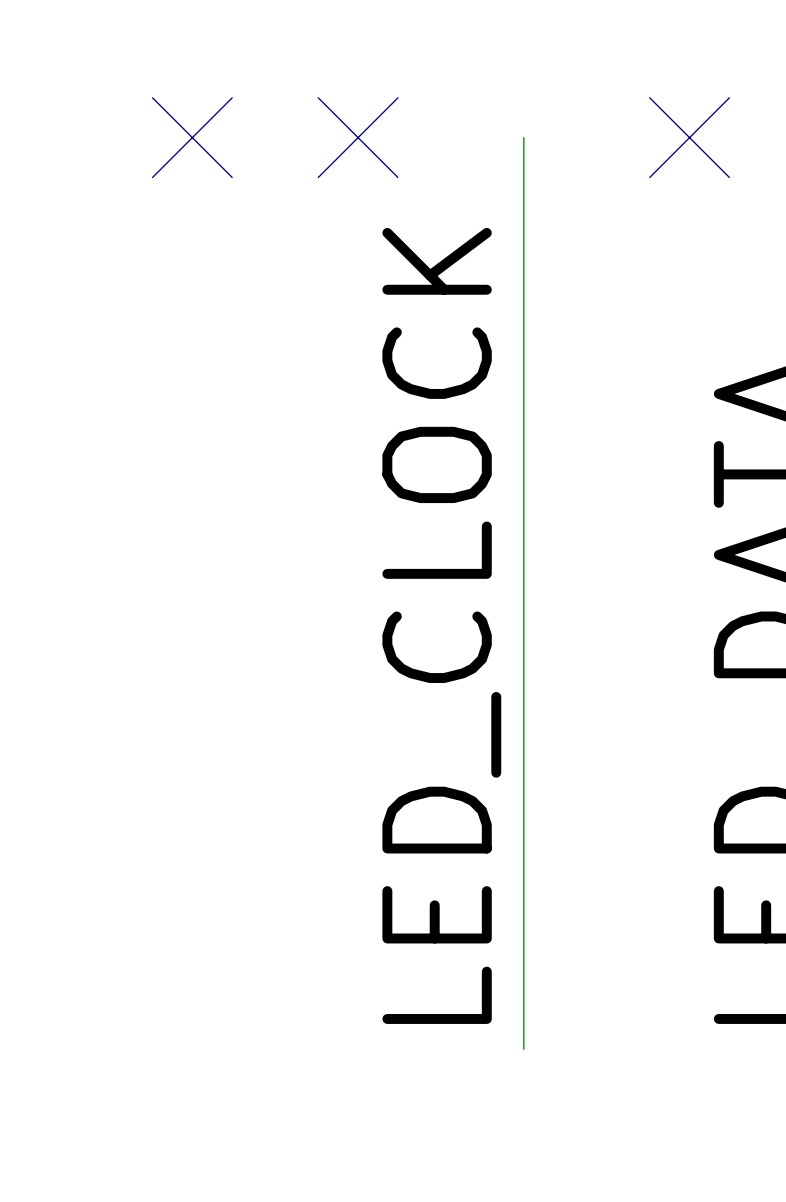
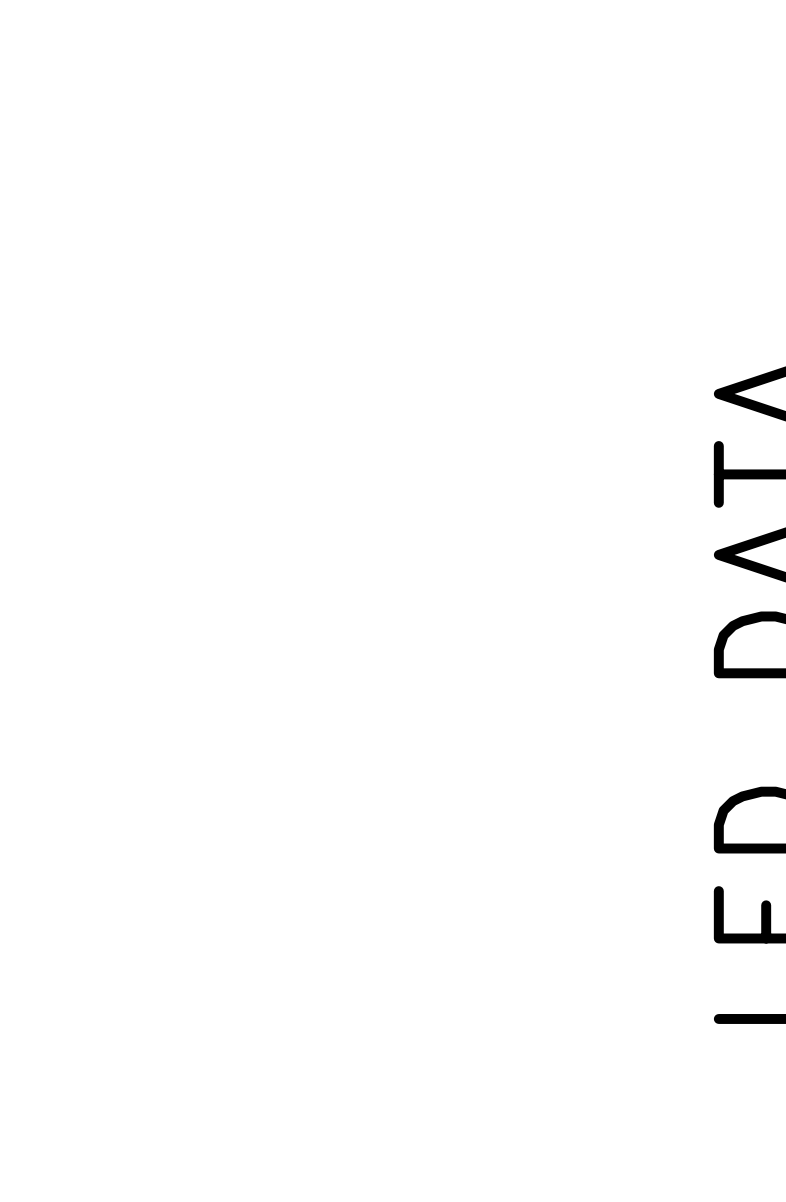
no-connect mark: (192, 137) -> none
no-connect mark: (358, 137) -> none
wire: (523, 137) (523, 1049) -> none
no-connect mark: (689, 137) -> none
label: LED_CLOCK (441, 625) -> none

